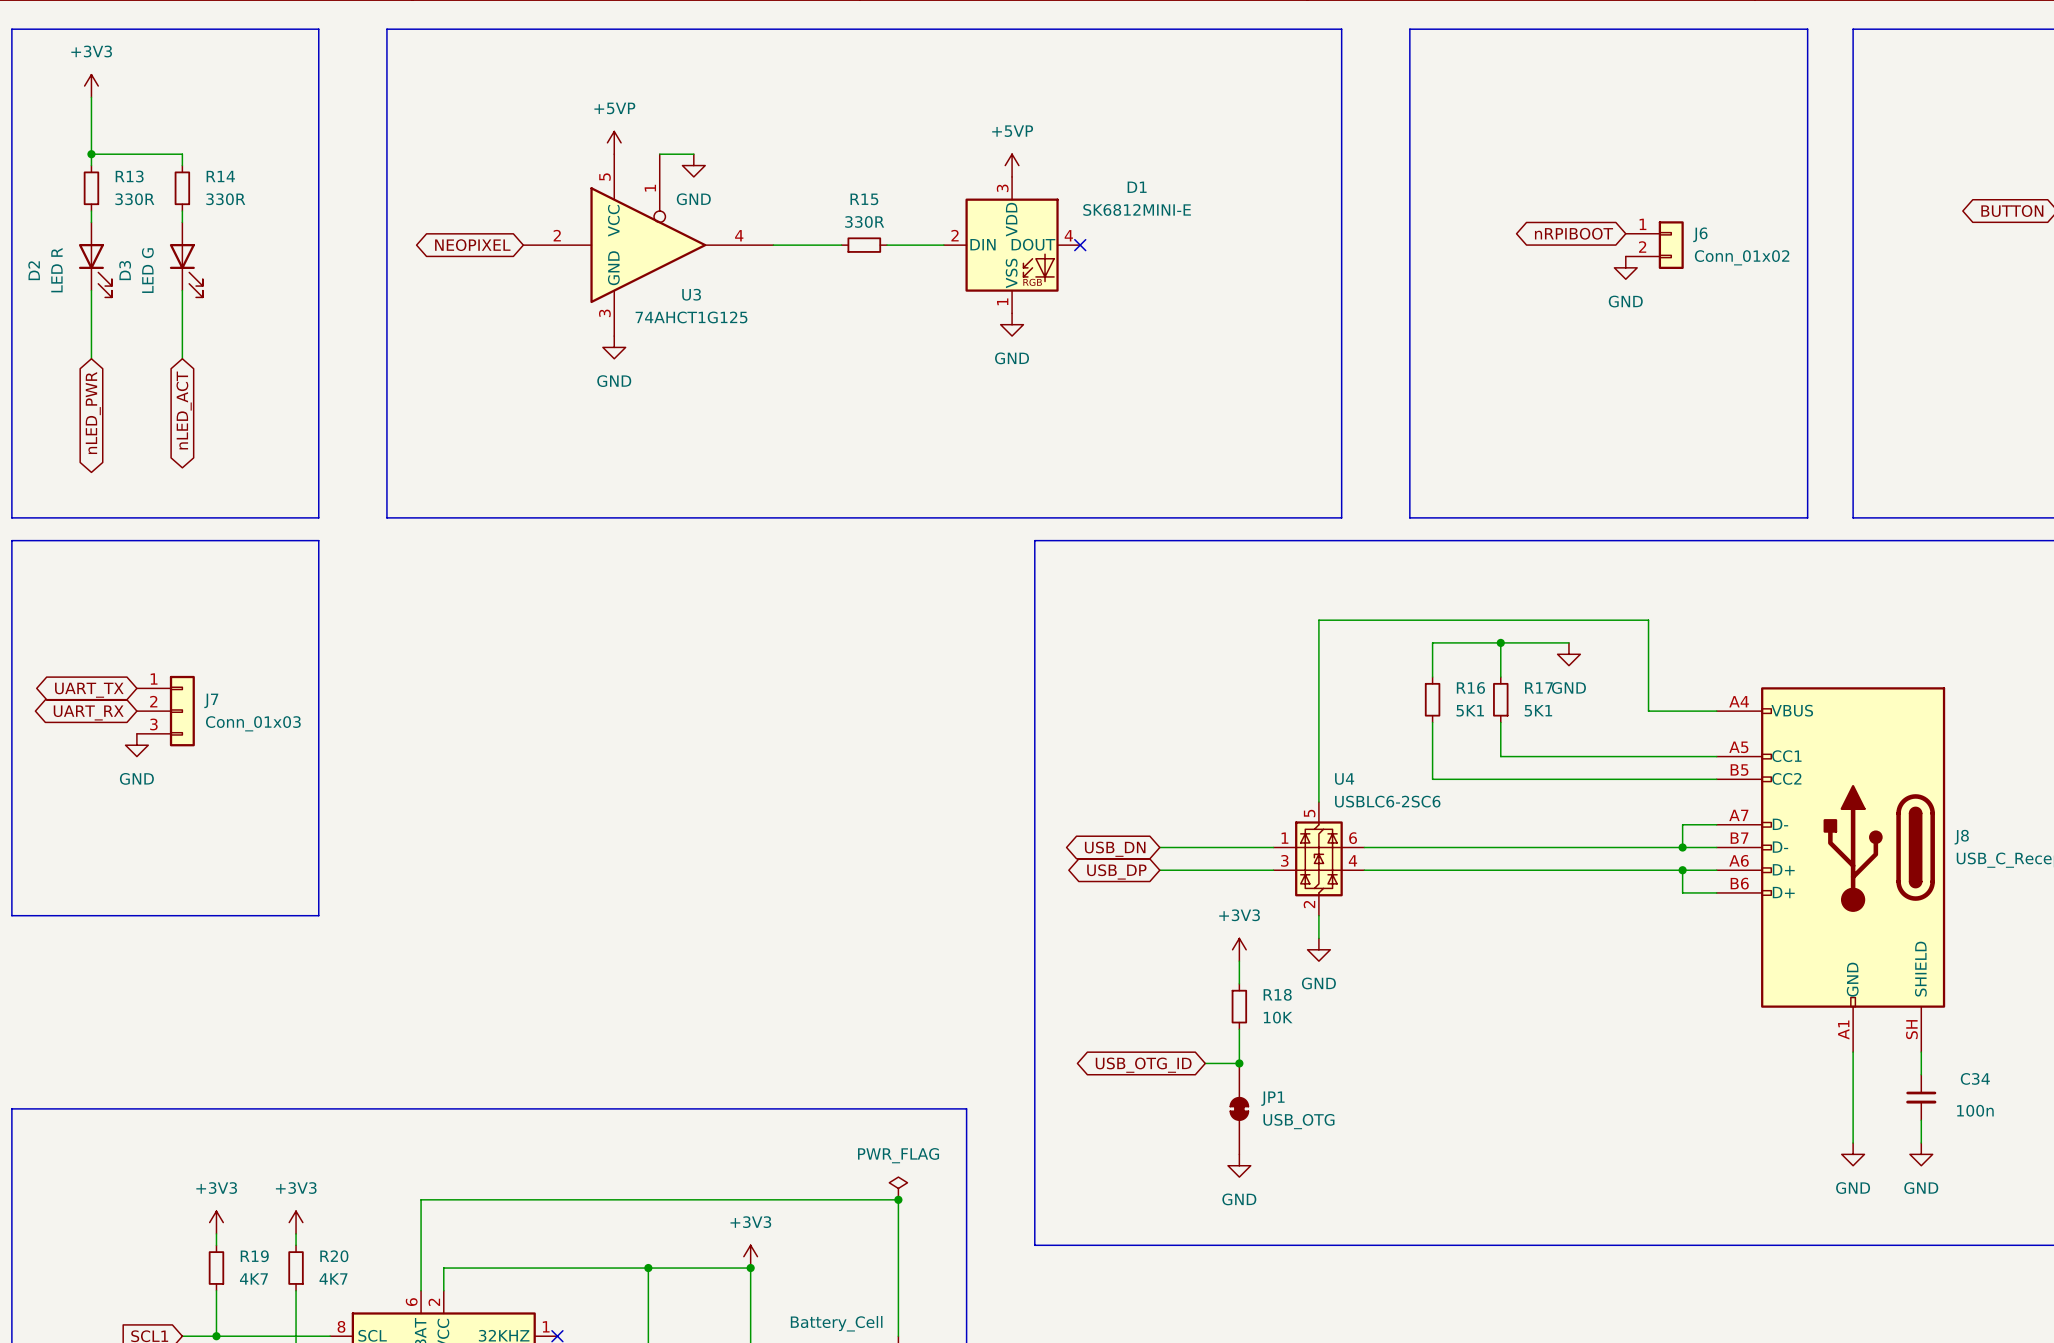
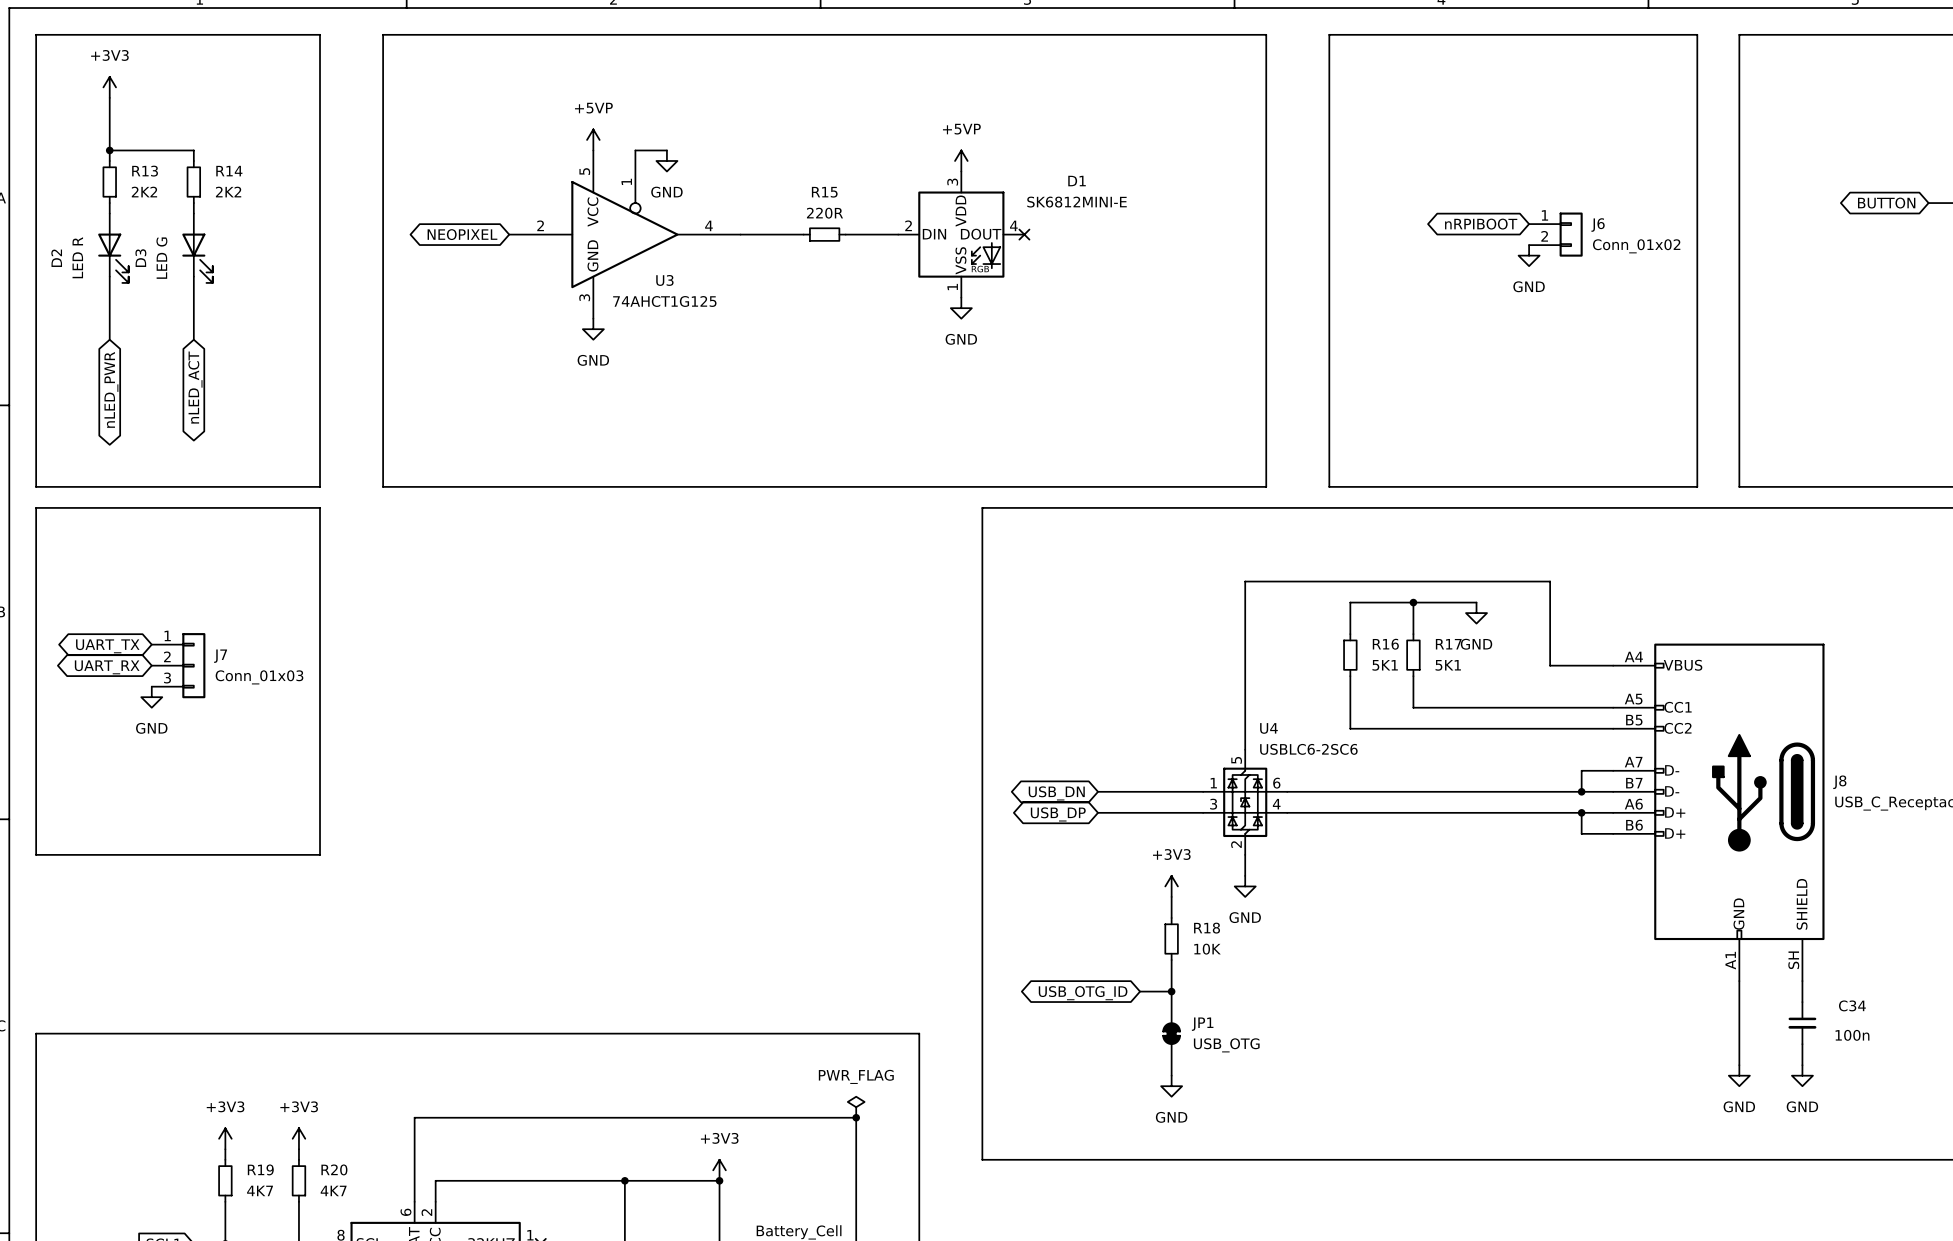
R13 value: 330R (134, 199) -> 2K2 (144, 192)
R14 value: 330R (225, 199) -> 2K2 (228, 192)
R15 value: 330R (864, 221) -> 220R (824, 213)

